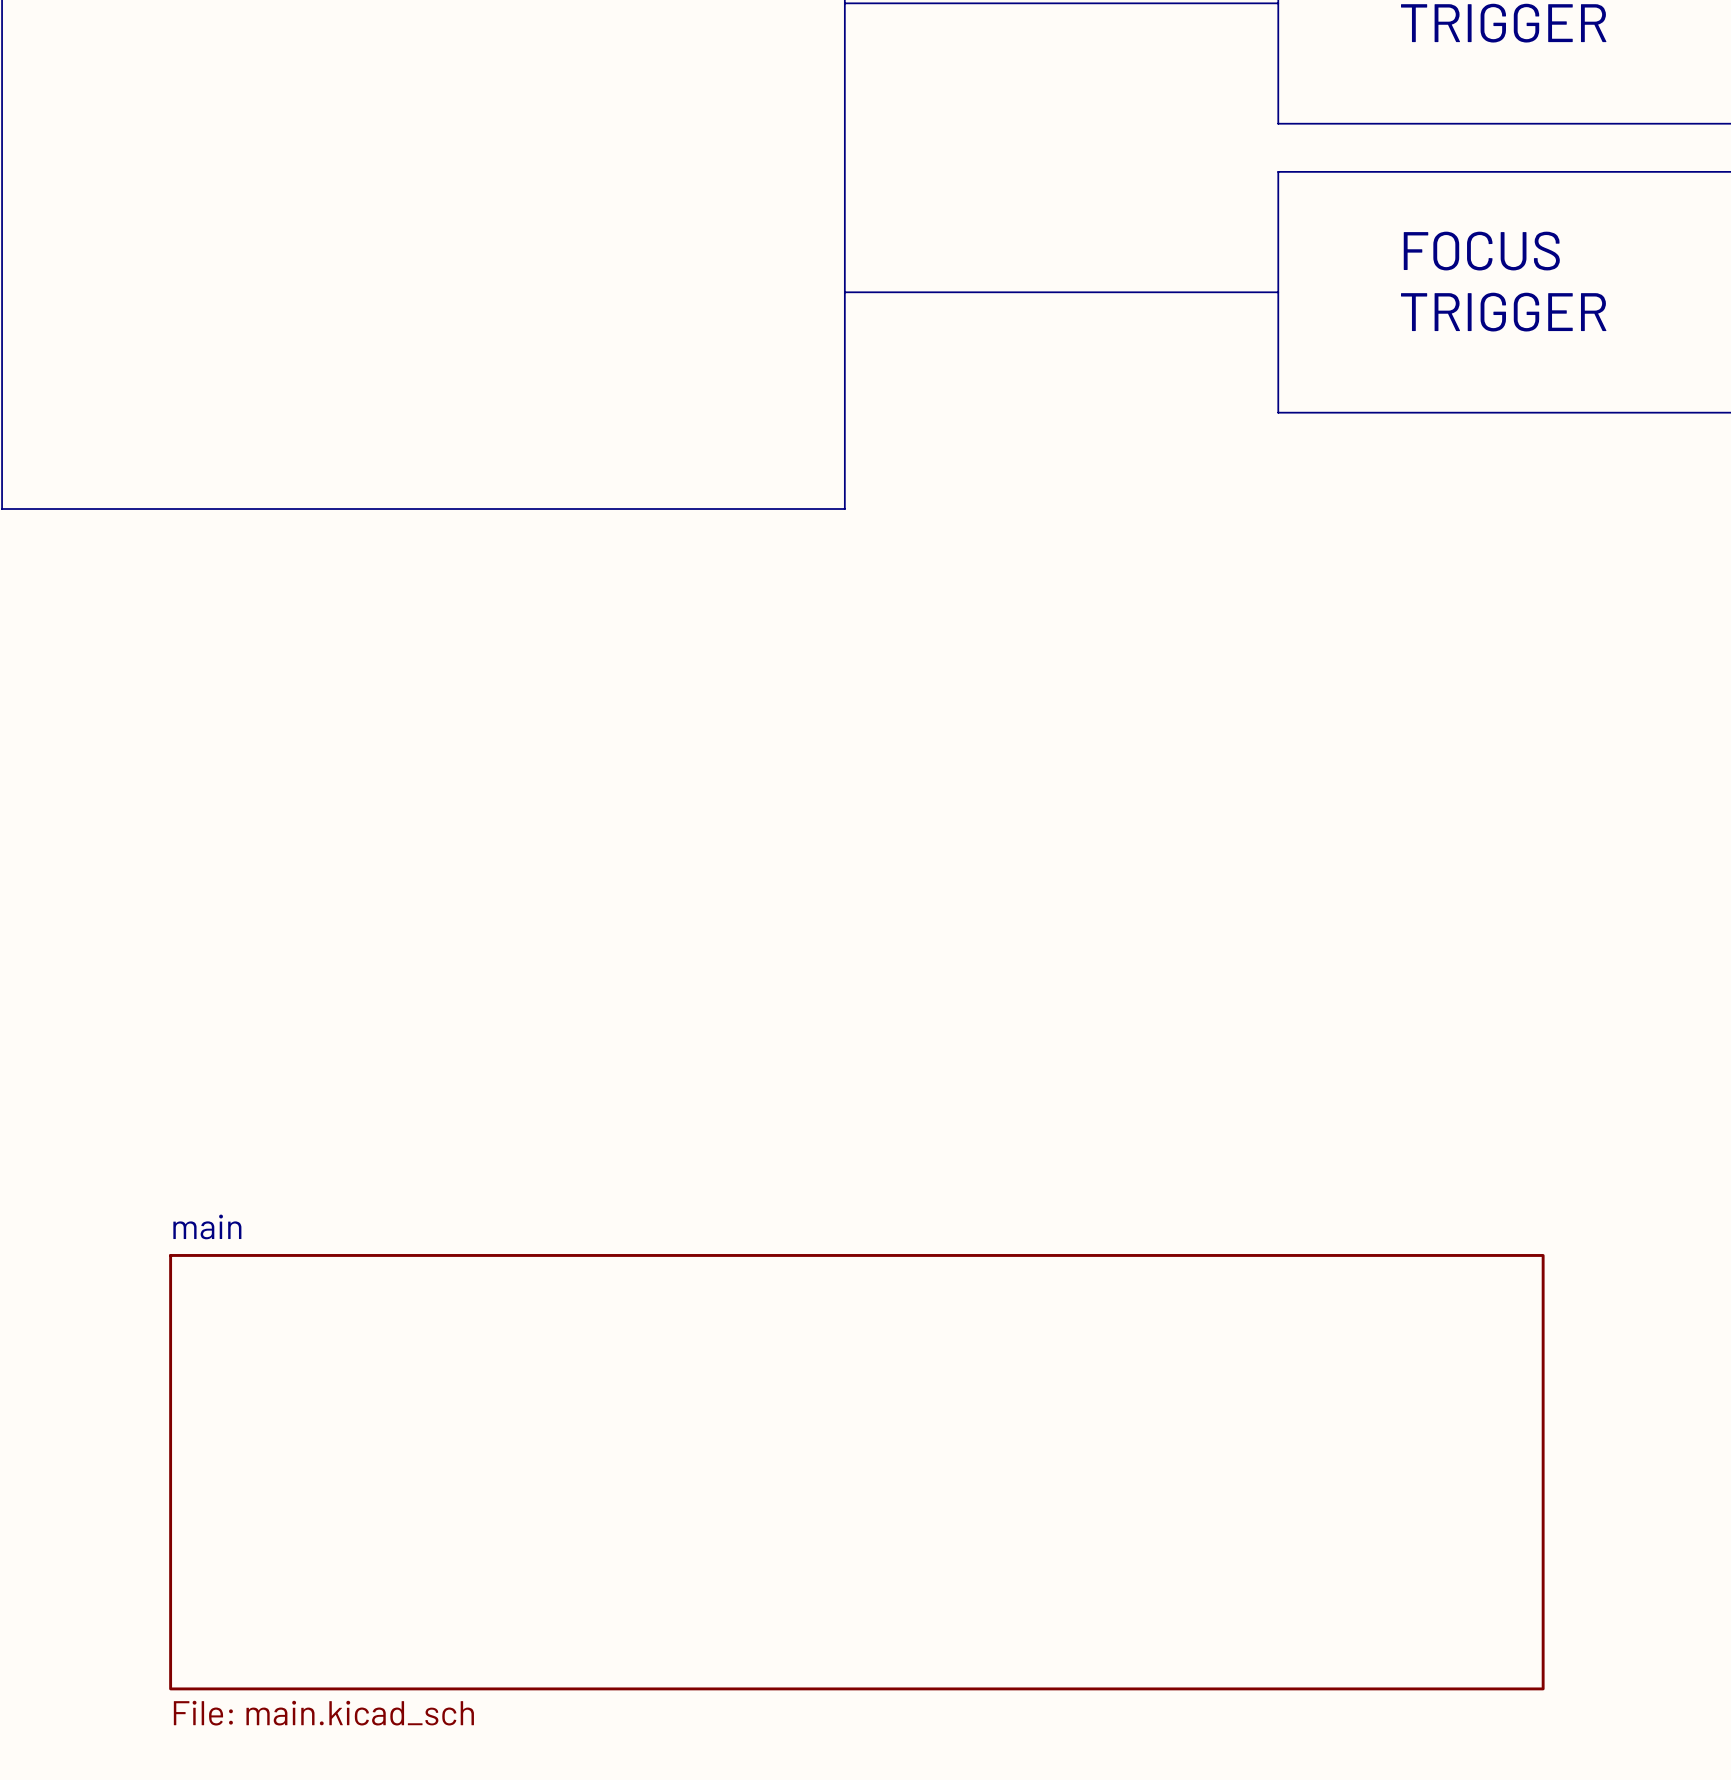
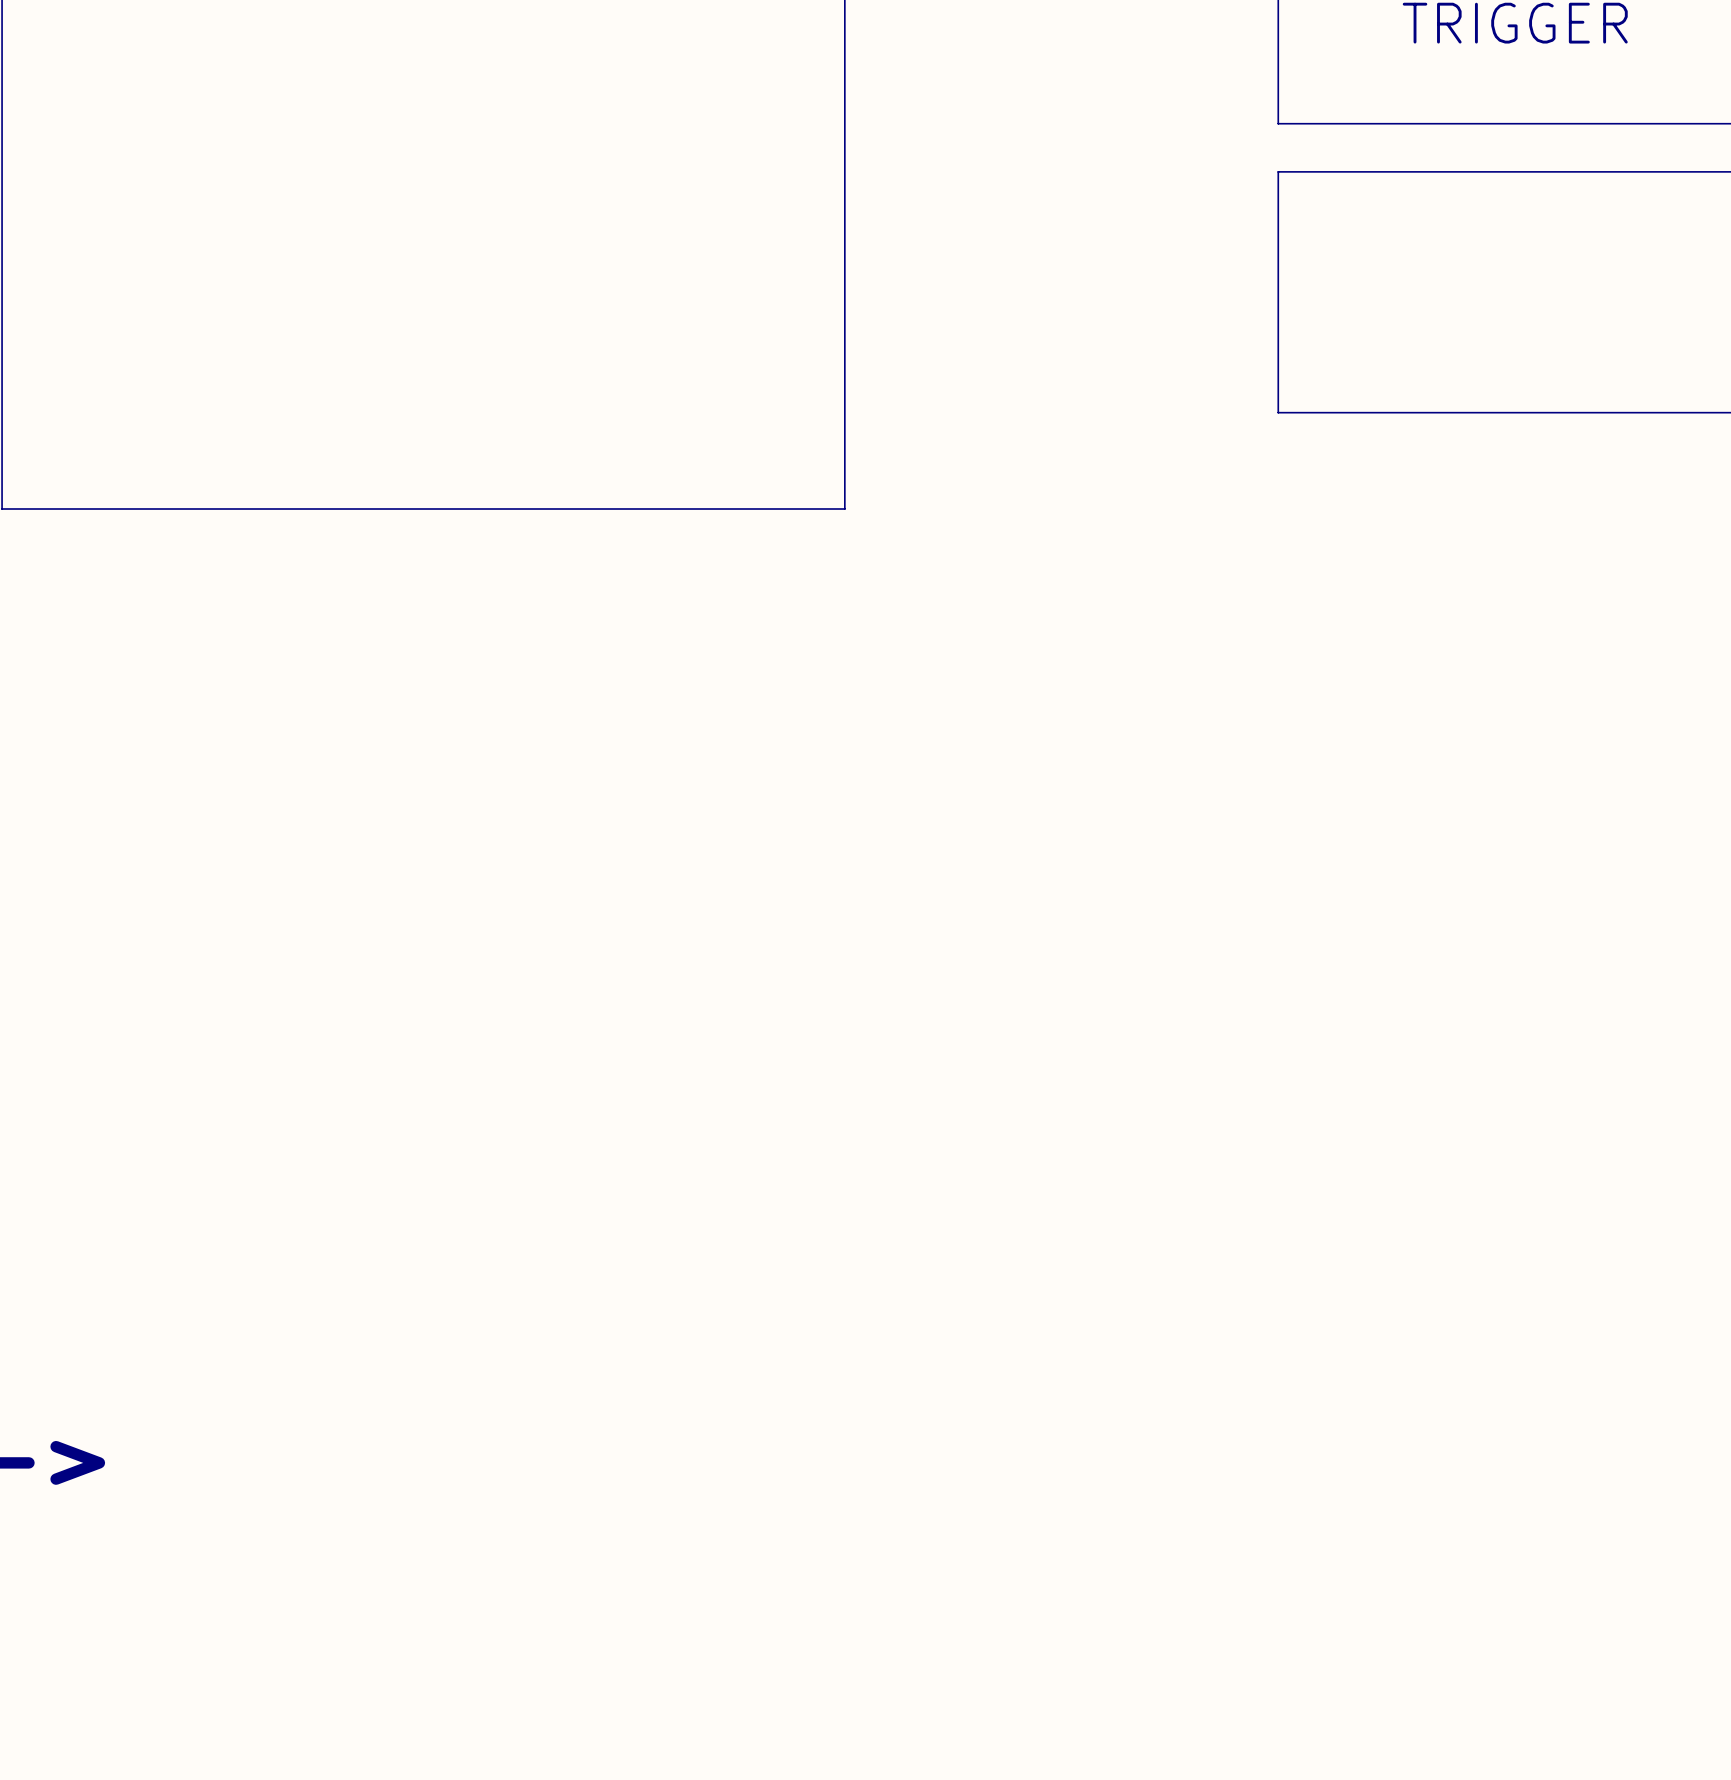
line: (844, 3) (1278, 3) -> none
text: FOCUS (1481, 251) -> none
line: (844, 292) (1278, 292) -> none
text: TRIGGER (1503, 312) -> none
sheet main: File: main.kicad_sch (856, 1472) -> none

